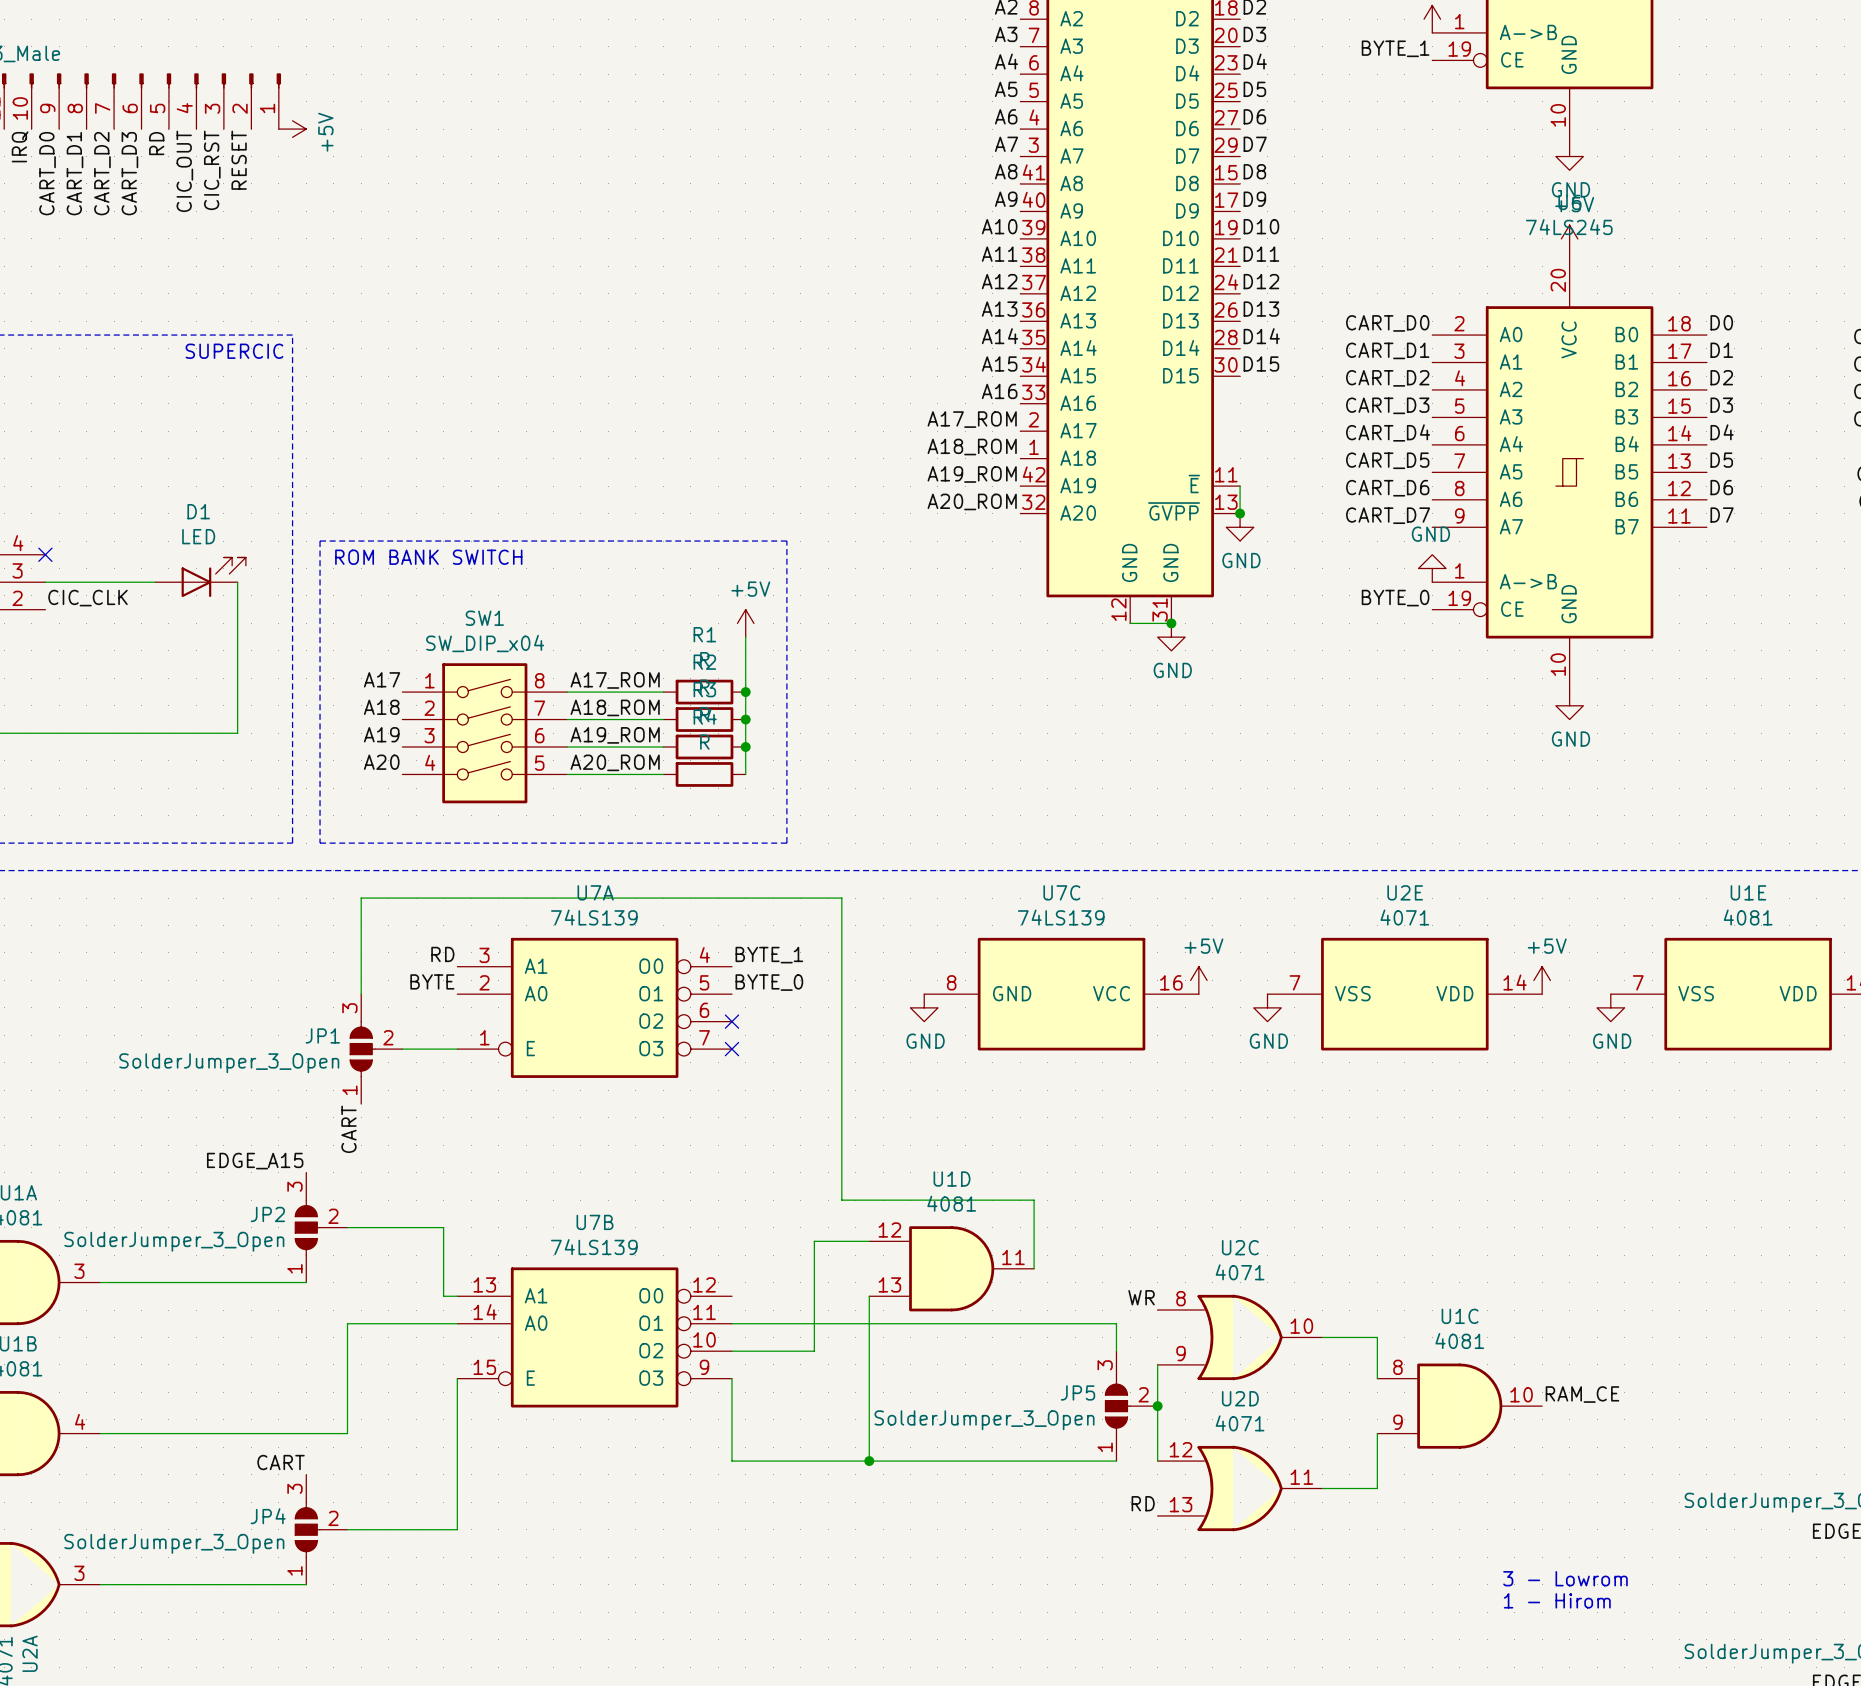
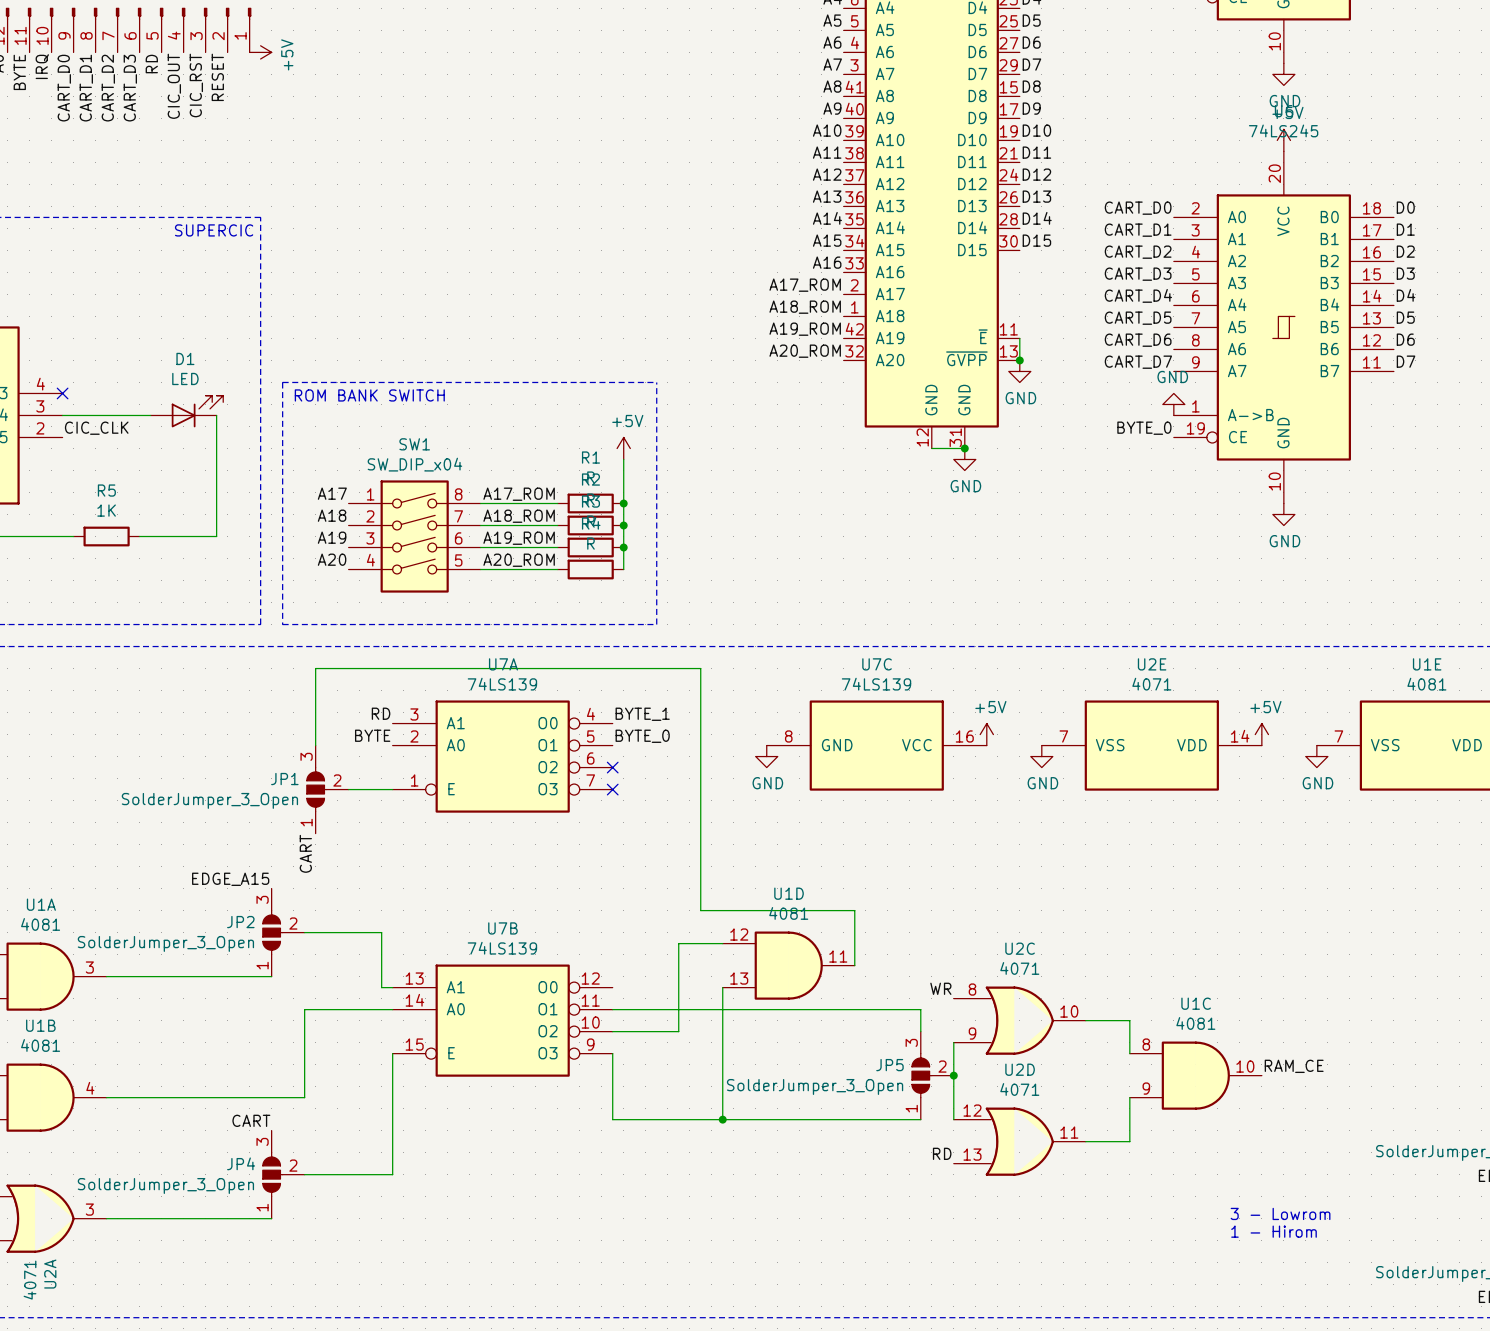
wire: (59, 733) (141, 733) -> none
R5: none -> 1K (106, 536)

